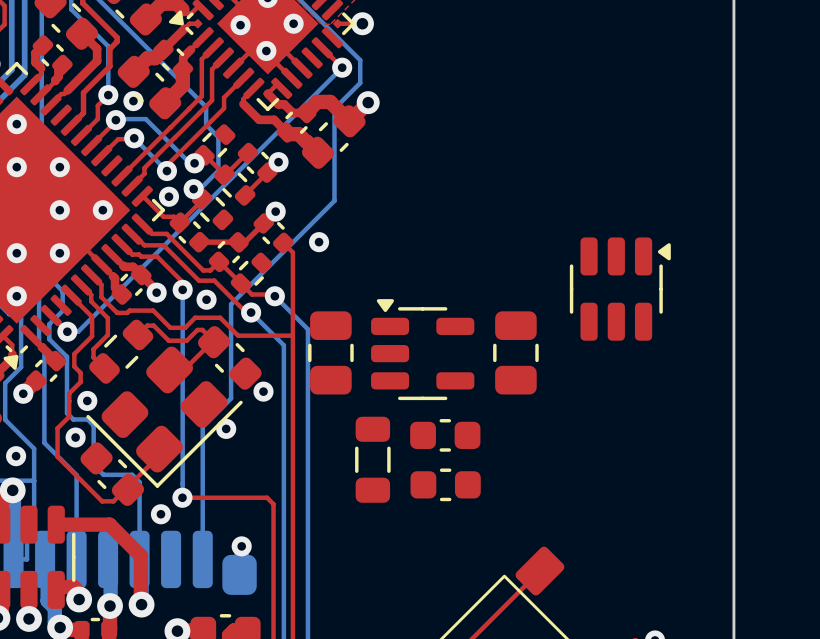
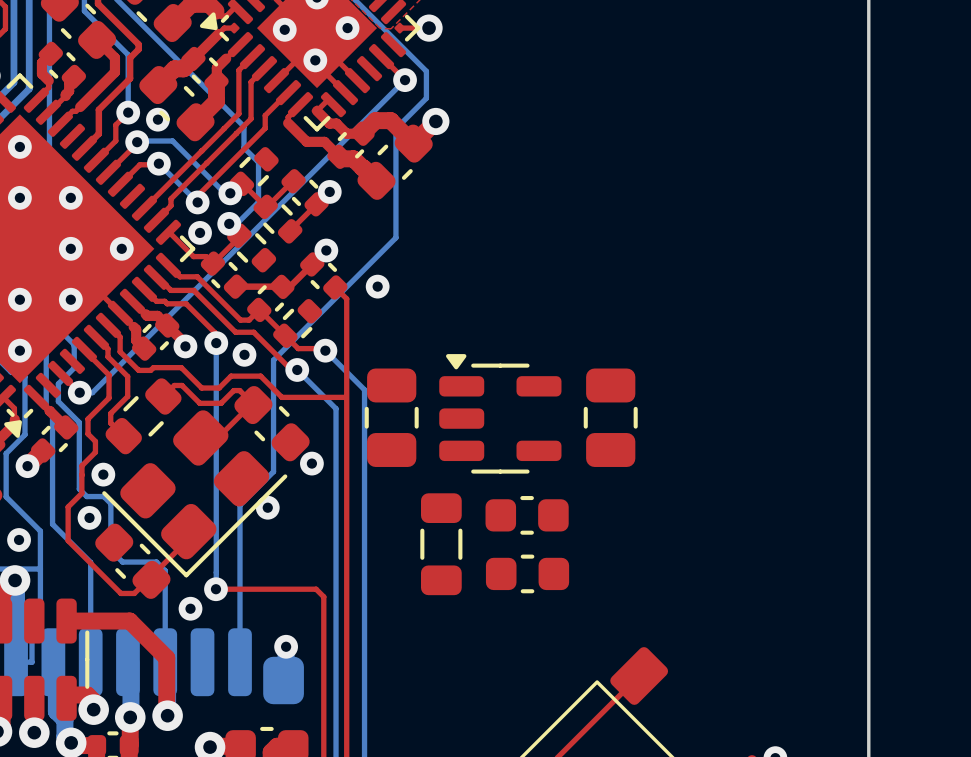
part: (620, 289) -> none

